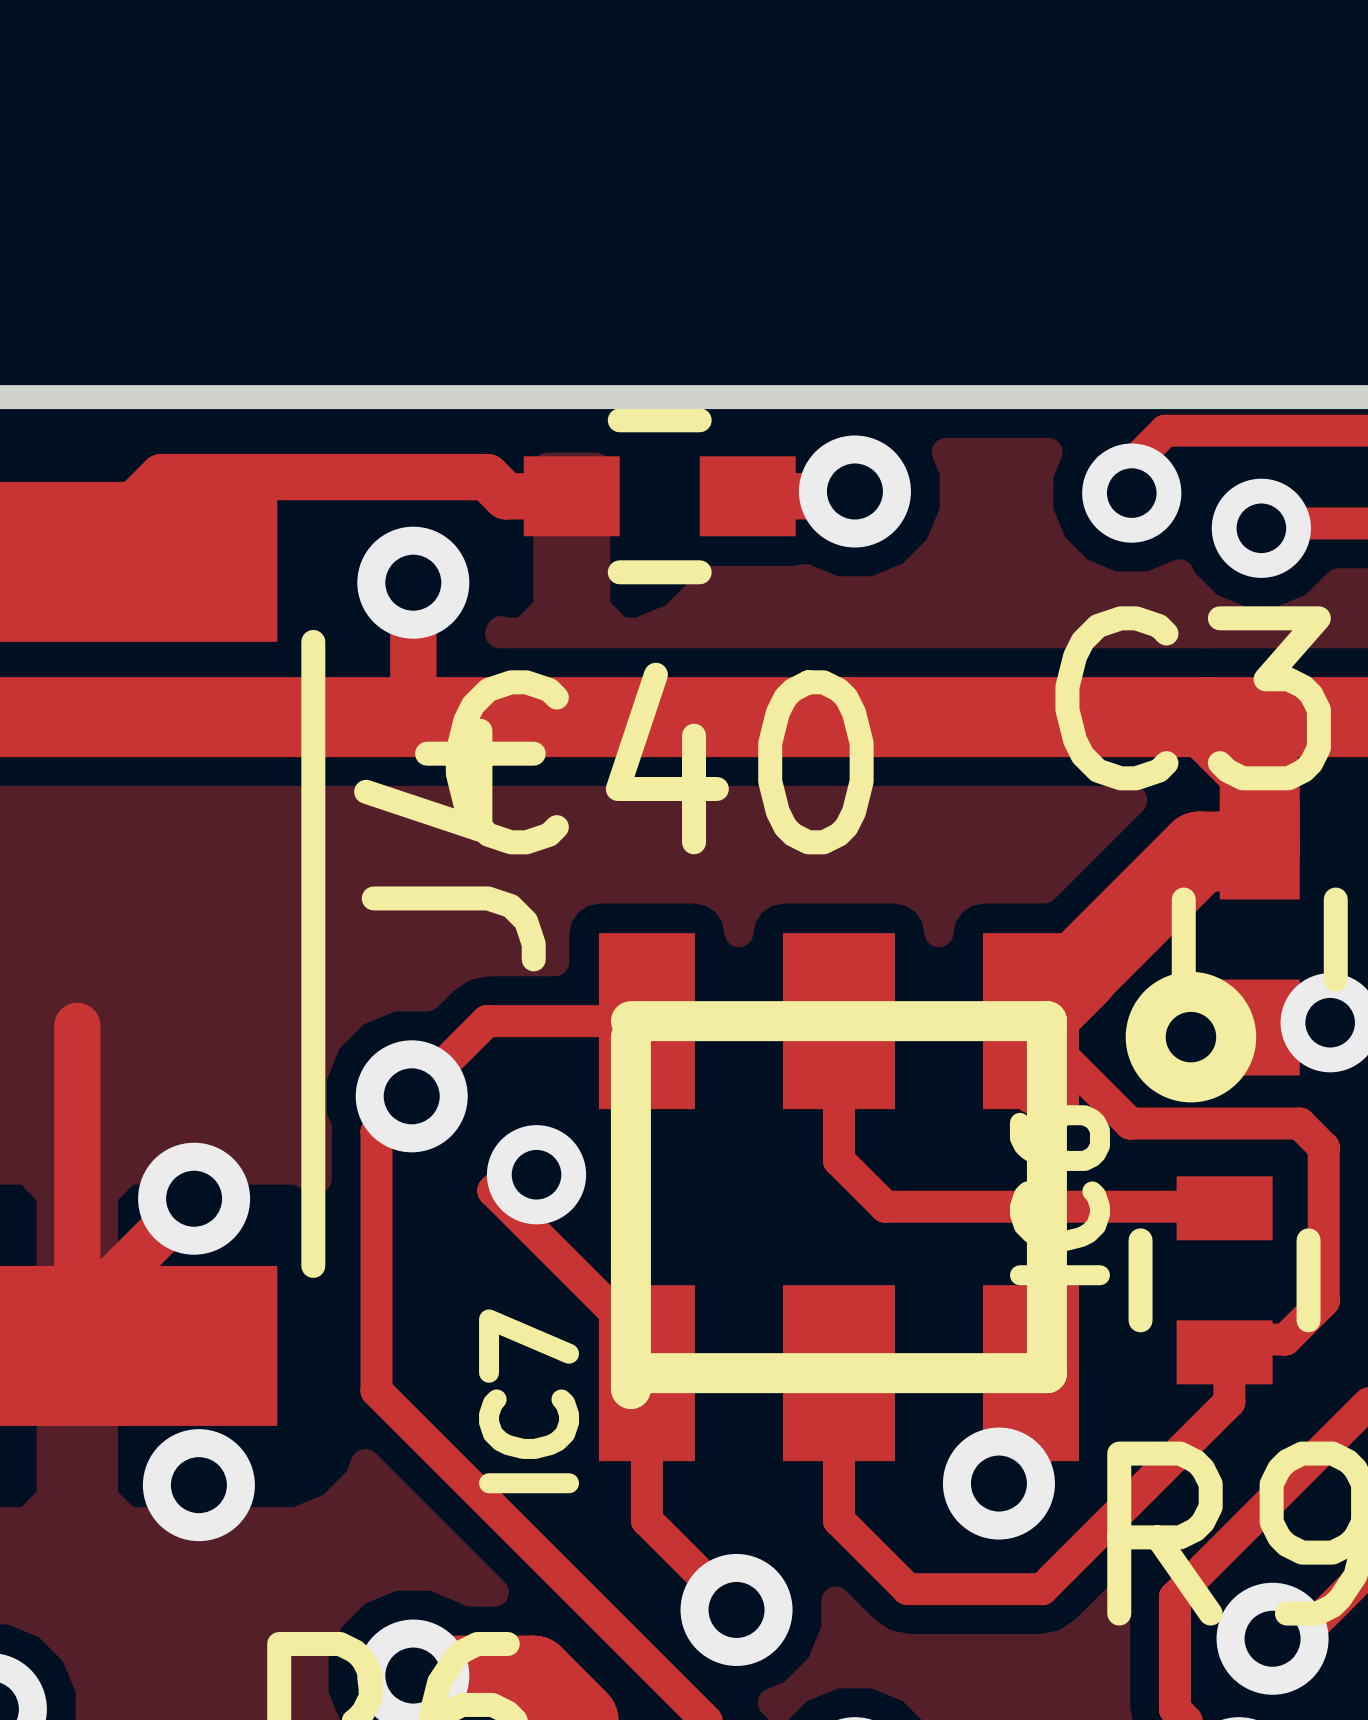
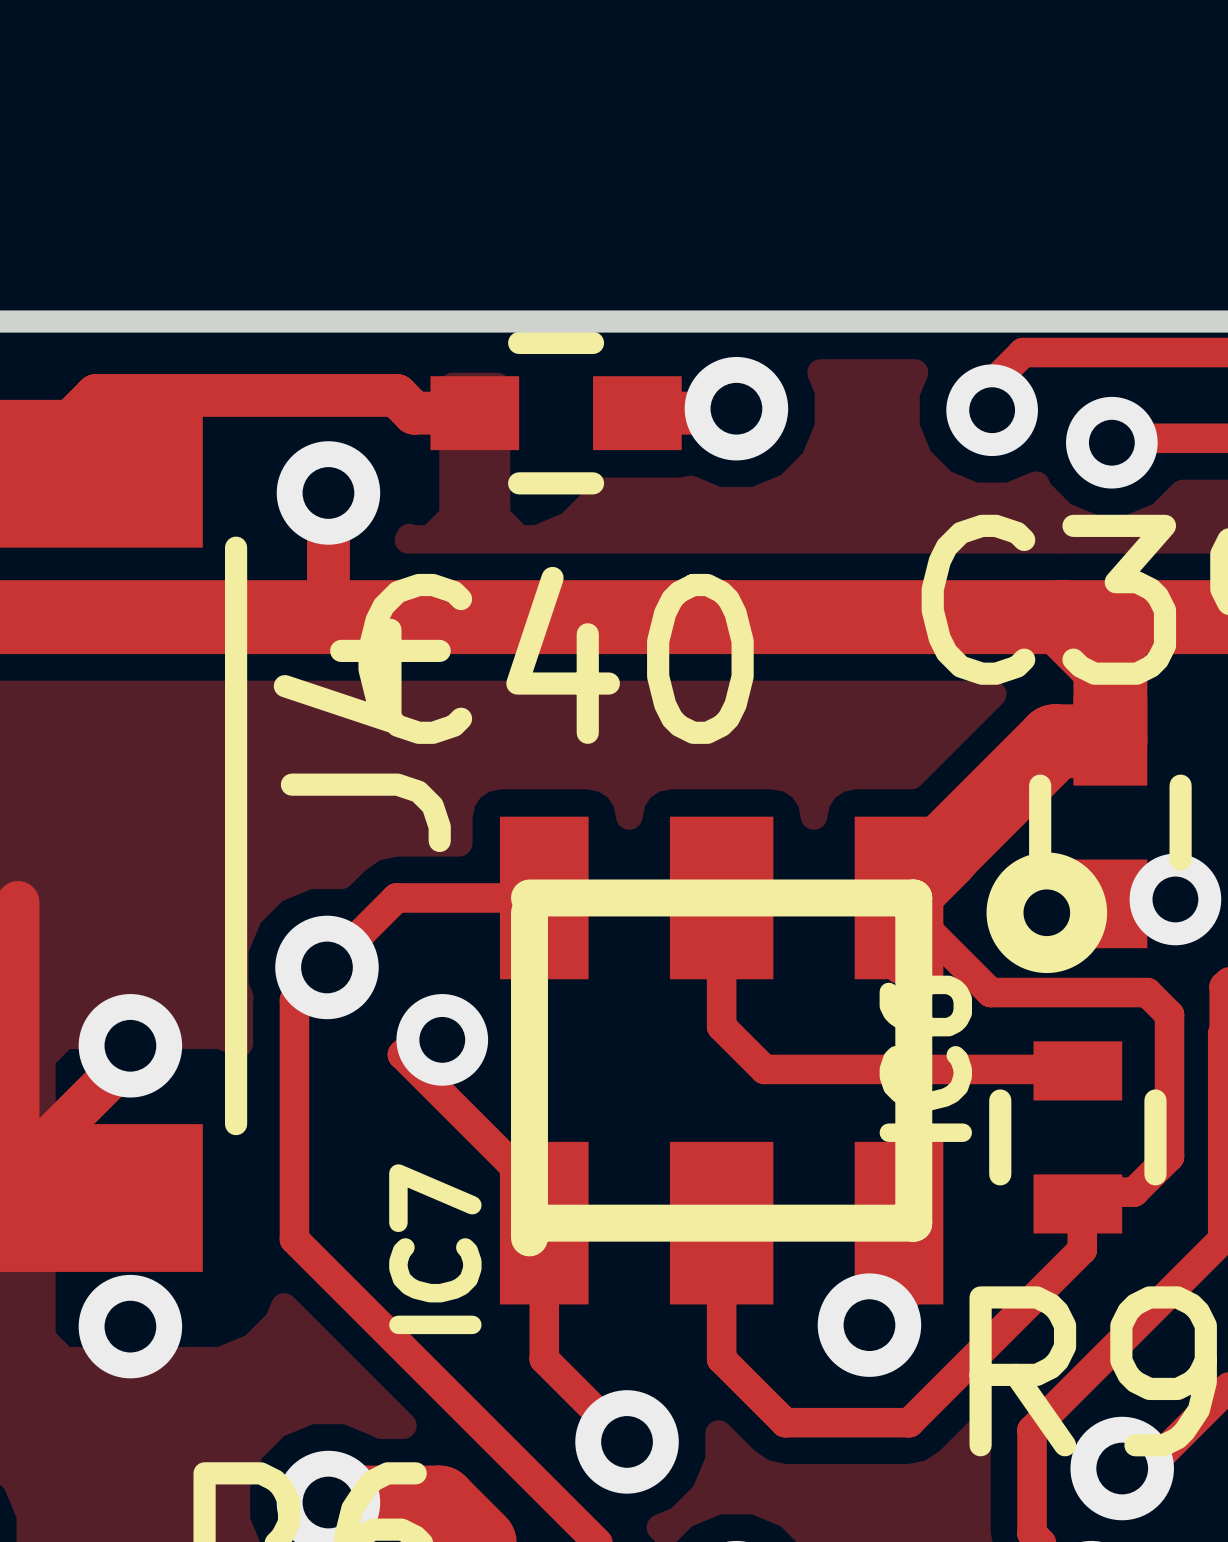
via position: (194, 1198) -> (130, 1045)

